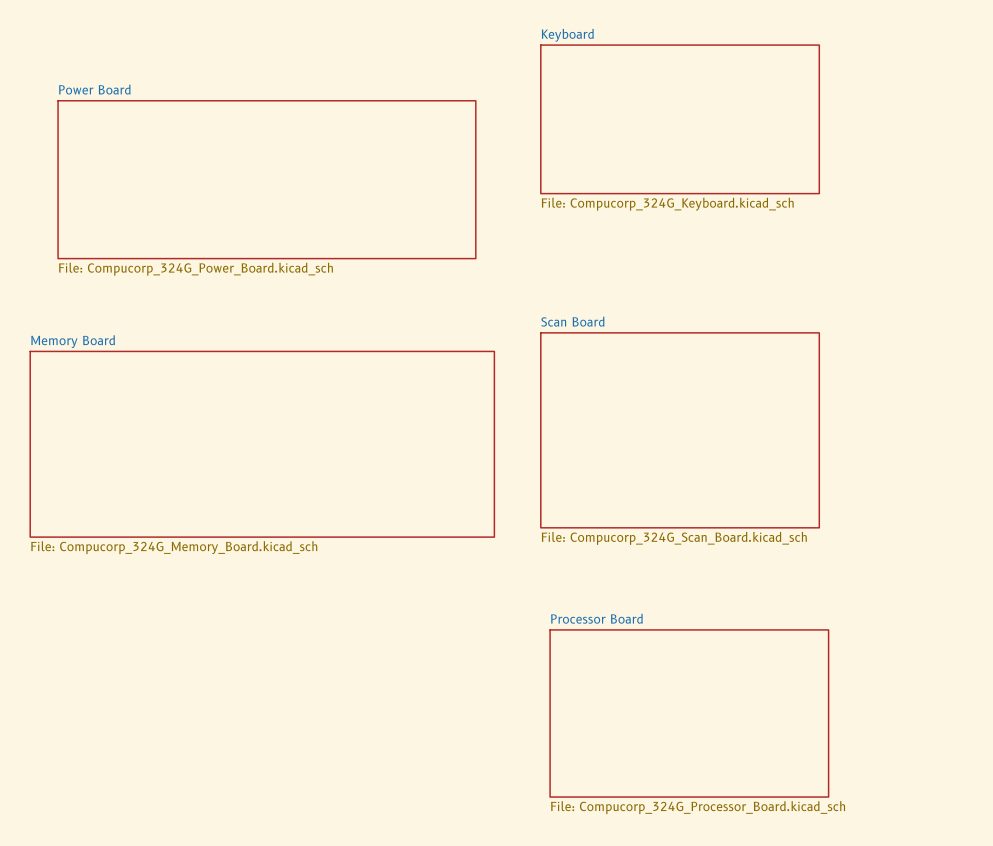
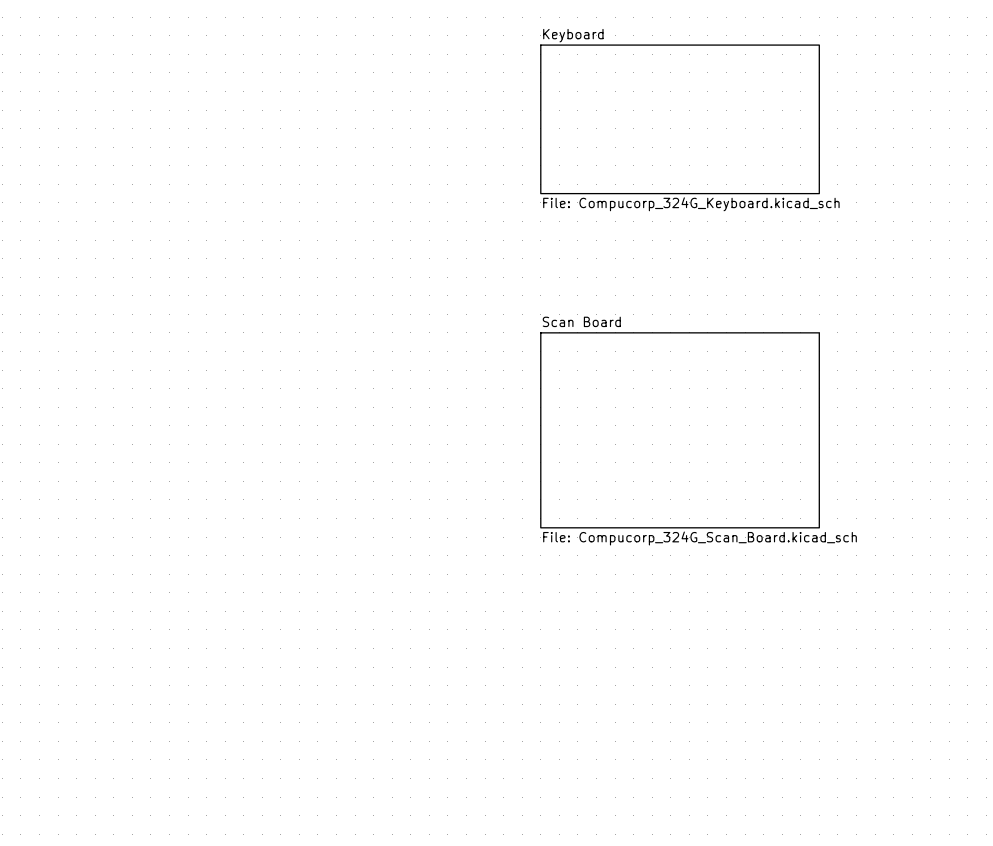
sheet Power Board: File: Compucorp_324G_Power_Board.kicad_sch (266, 179) -> none
sheet Memory Board: File: Compucorp_324G_Memory_Board.kicad_sch (262, 444) -> none
sheet Processor Board: File: Compucorp_324G_Processor_Board.kicad_sch (689, 713) -> none

